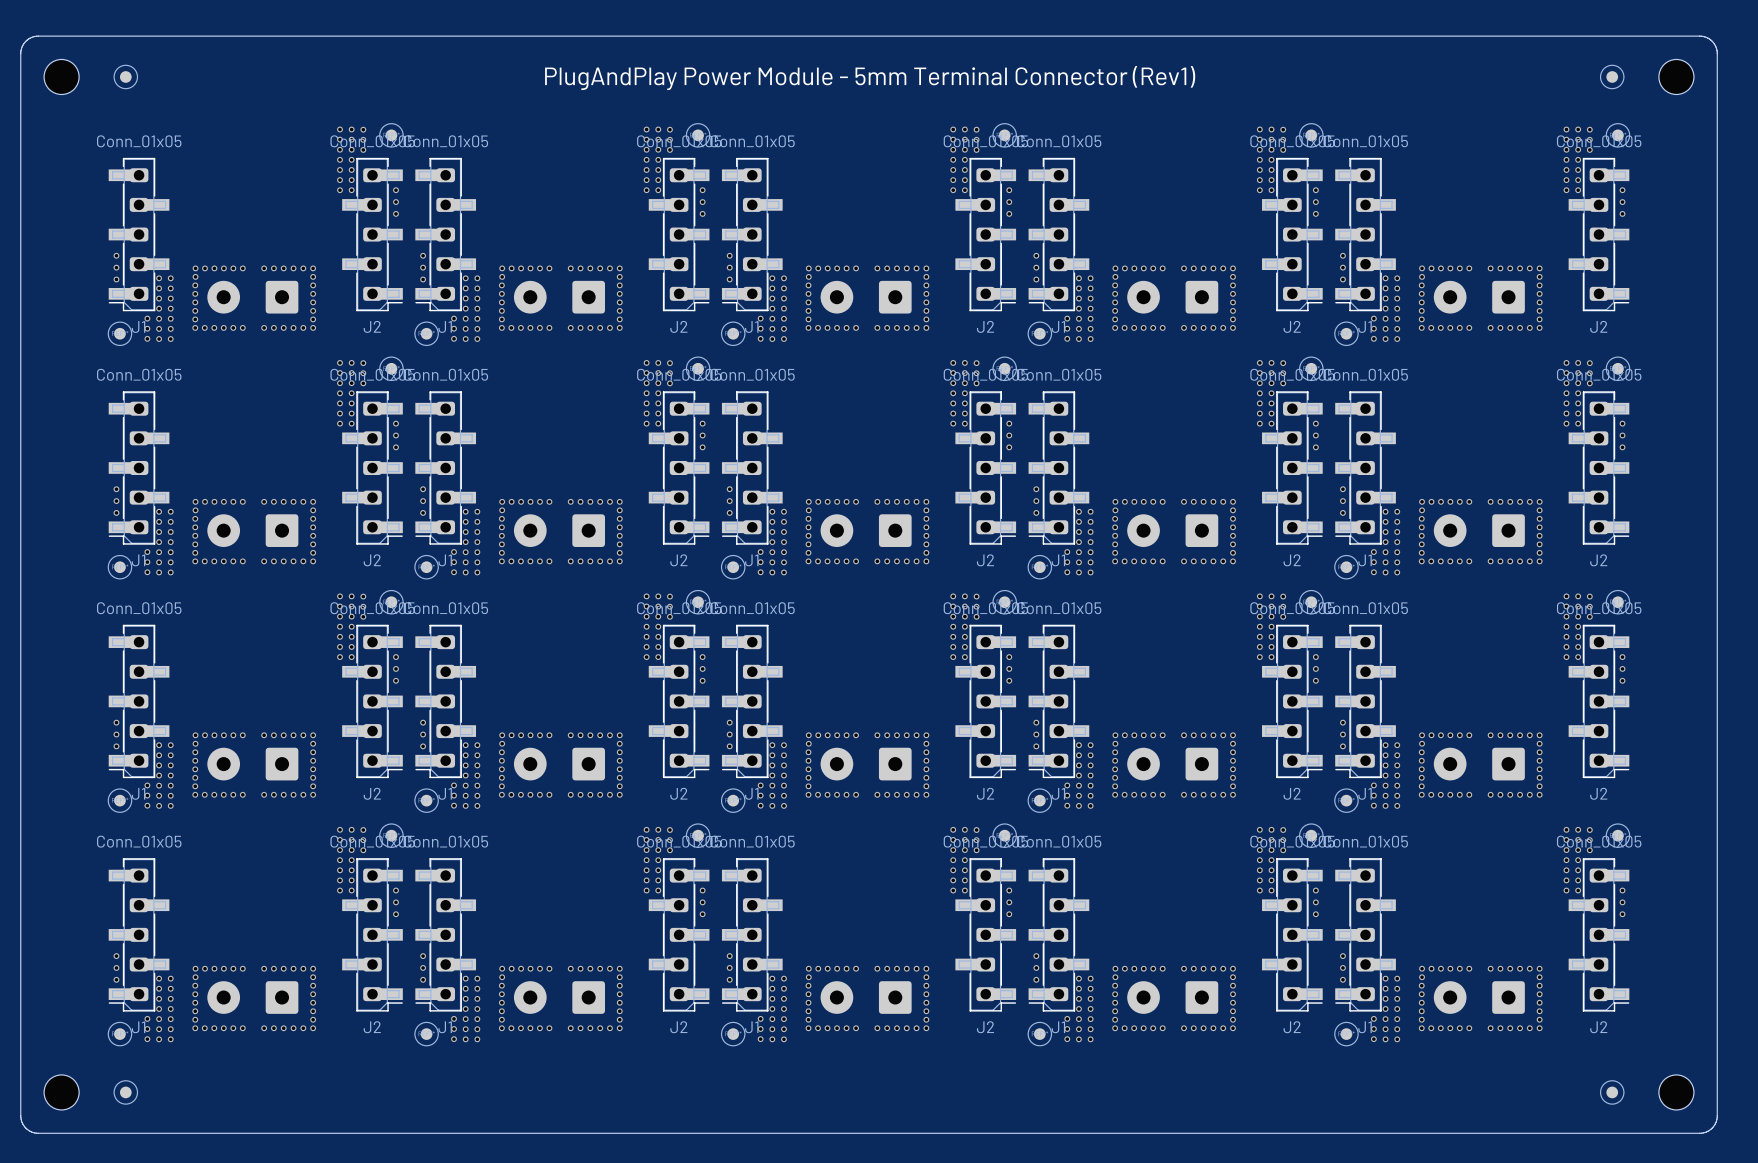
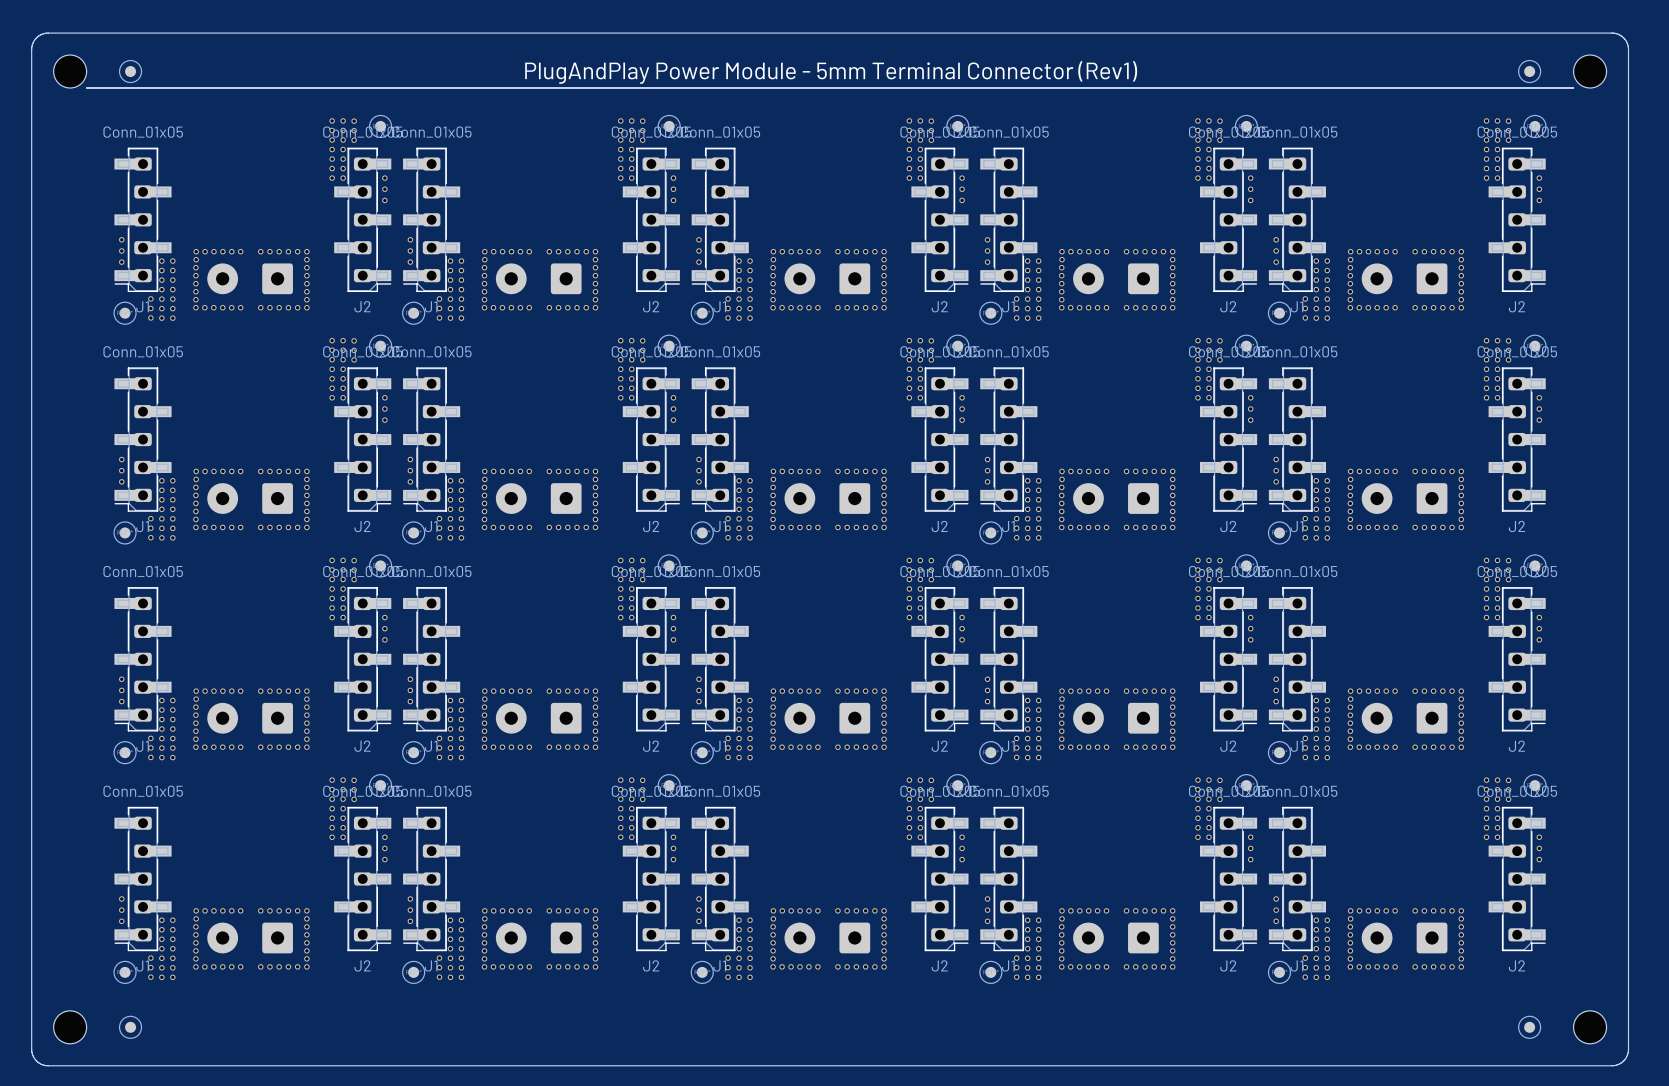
board edge: none -> (86, 88) (1573, 88)

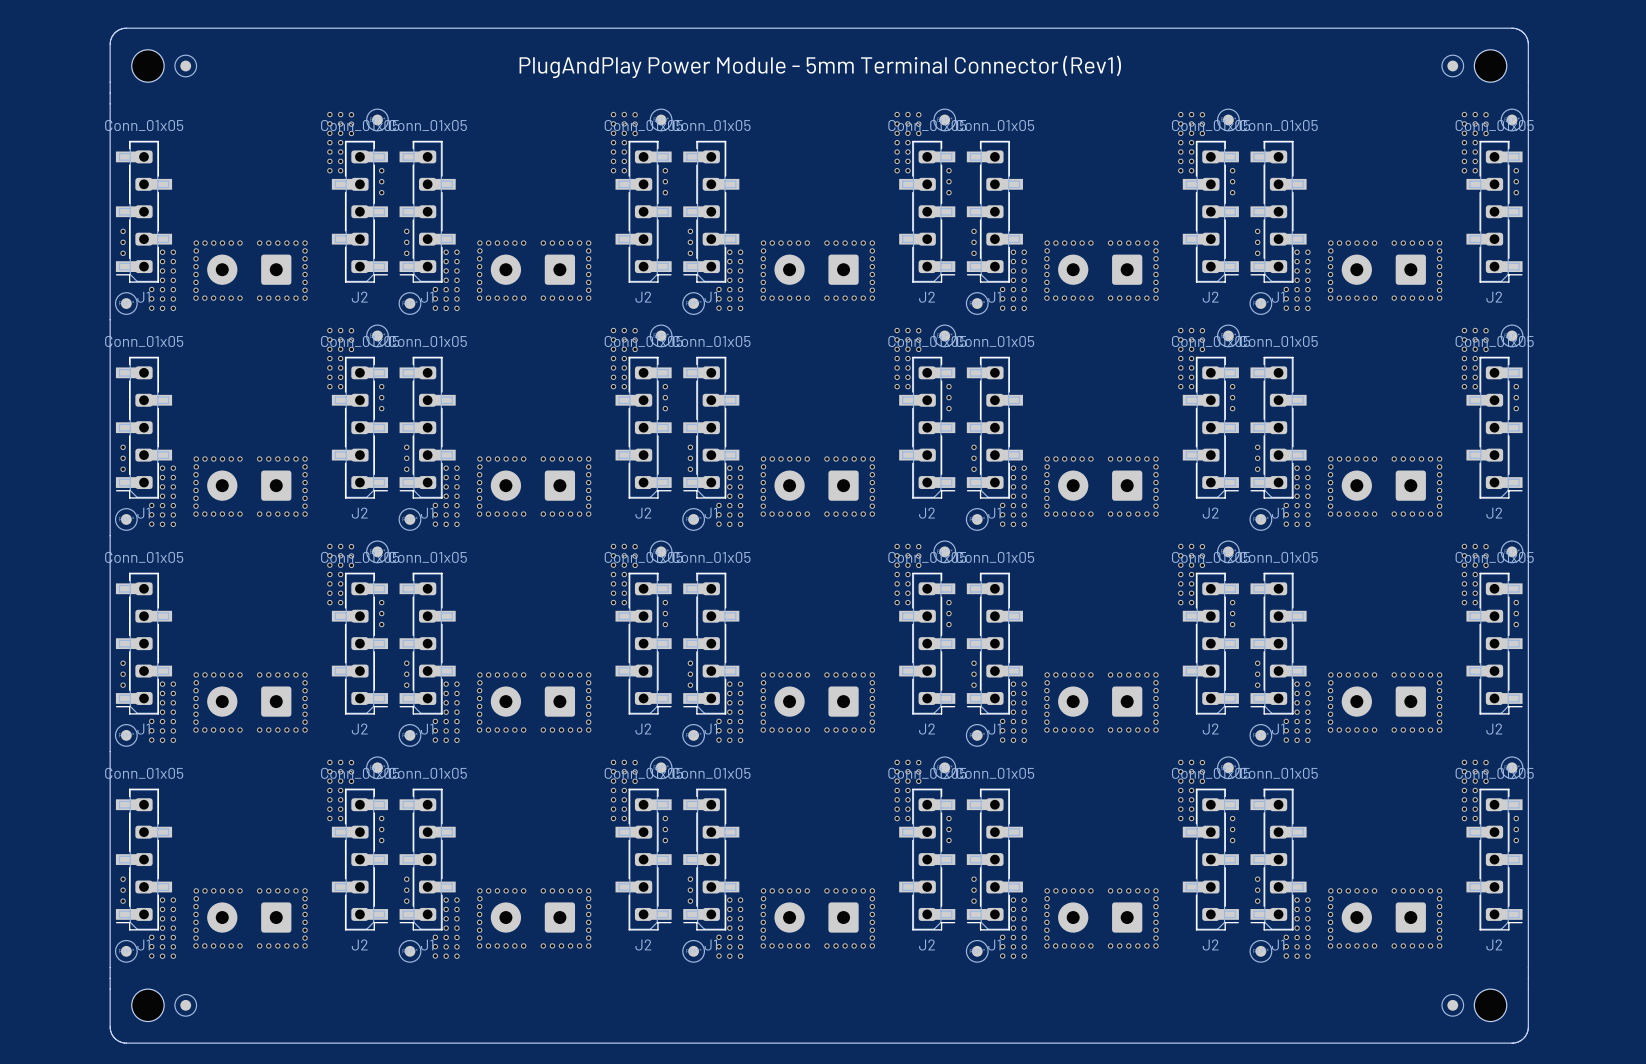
board edge: (125, 33) (44, 33) (35, 39) (31, 49) (31, 1050) (36, 1060) (44, 1065) (125, 1065) -> (126, 28) (114, 32) (110, 44) (110, 1026) (114, 1038) (126, 1043)
board edge: (1535, 33) (1615, 33) (1624, 39) (1628, 49) (1628, 1050) (1623, 1060) (1615, 1065) (1535, 1065) -> (1512, 28) (1523, 32) (1528, 44) (1528, 1026) (1523, 1038) (1512, 1043)
part position: (70, 71) -> (147, 65)
part position: (130, 71) -> (185, 65)
part position: (1529, 71) -> (1452, 65)
part position: (1590, 71) -> (1490, 65)
board edge: (86, 88) (1573, 88) -> none
part position: (70, 1027) -> (147, 1005)
part position: (130, 1027) -> (185, 1005)
part position: (1529, 1027) -> (1452, 1005)
part position: (1590, 1027) -> (1490, 1005)

